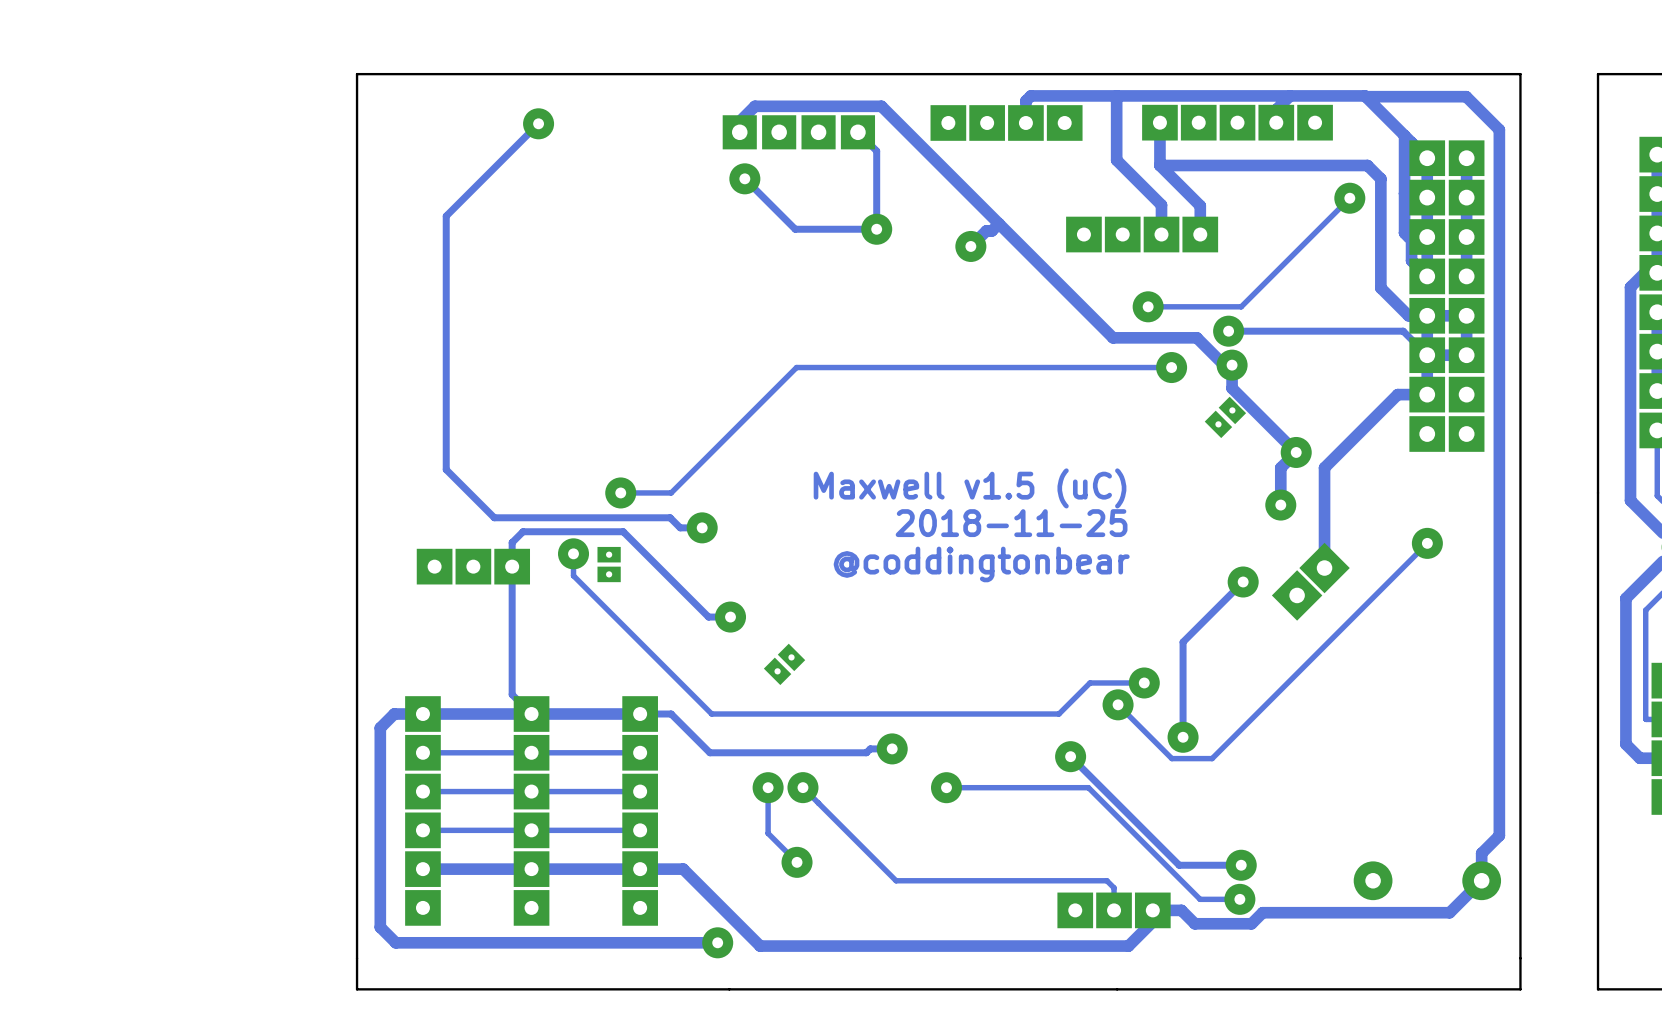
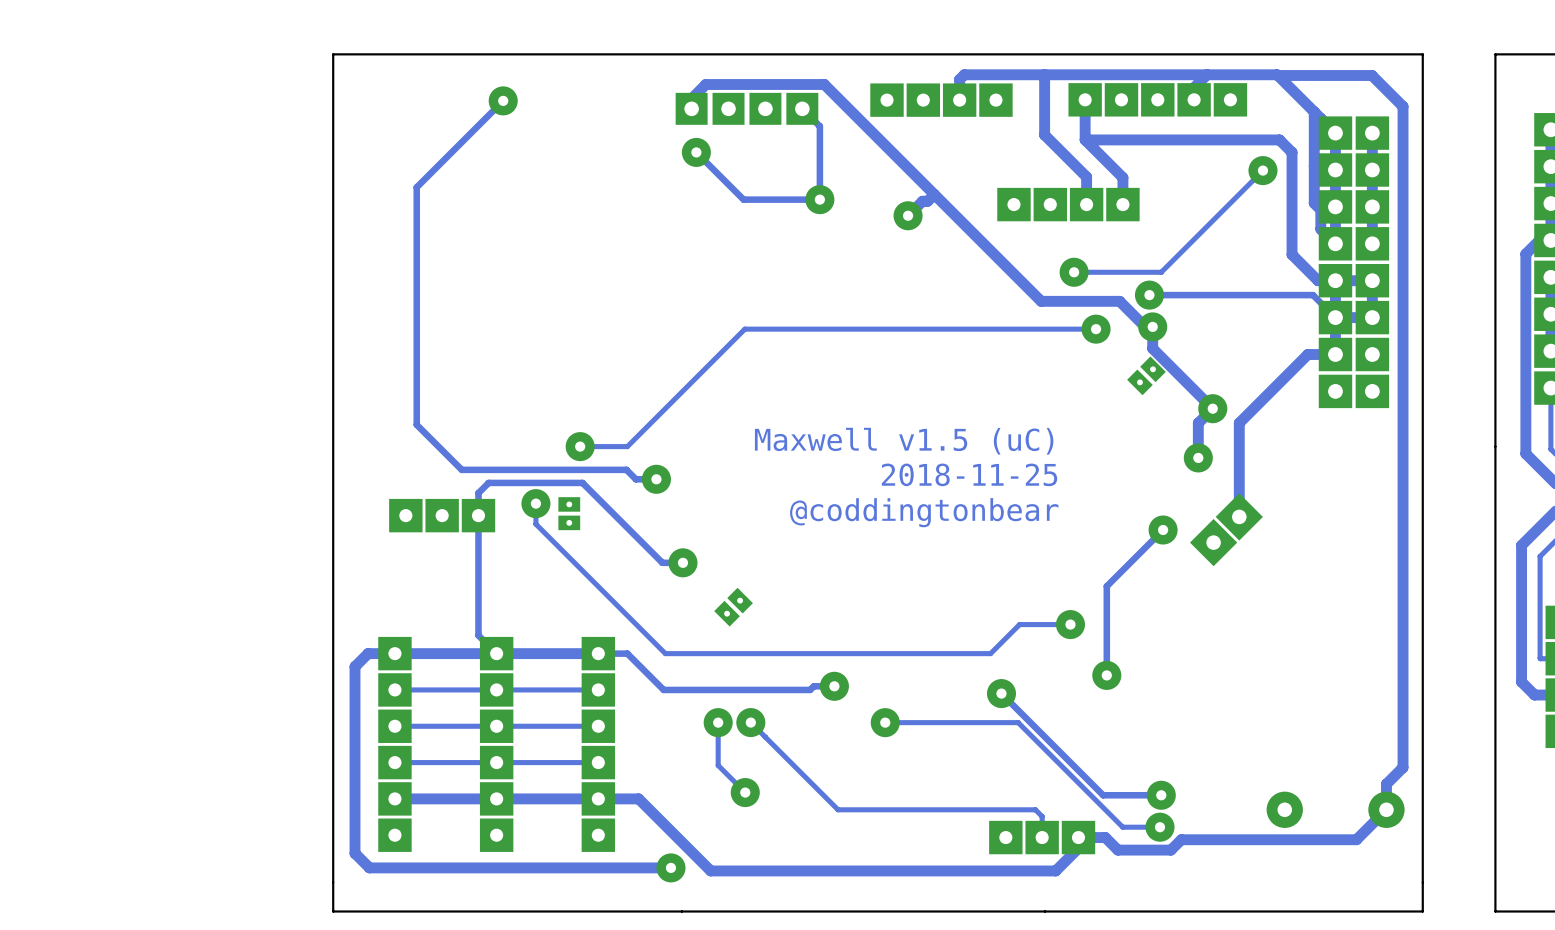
track: (1427, 543) (1212, 758) (1171, 758) (1118, 704) -> none
via: (1427, 543) -> none
via: (1118, 704) -> none

